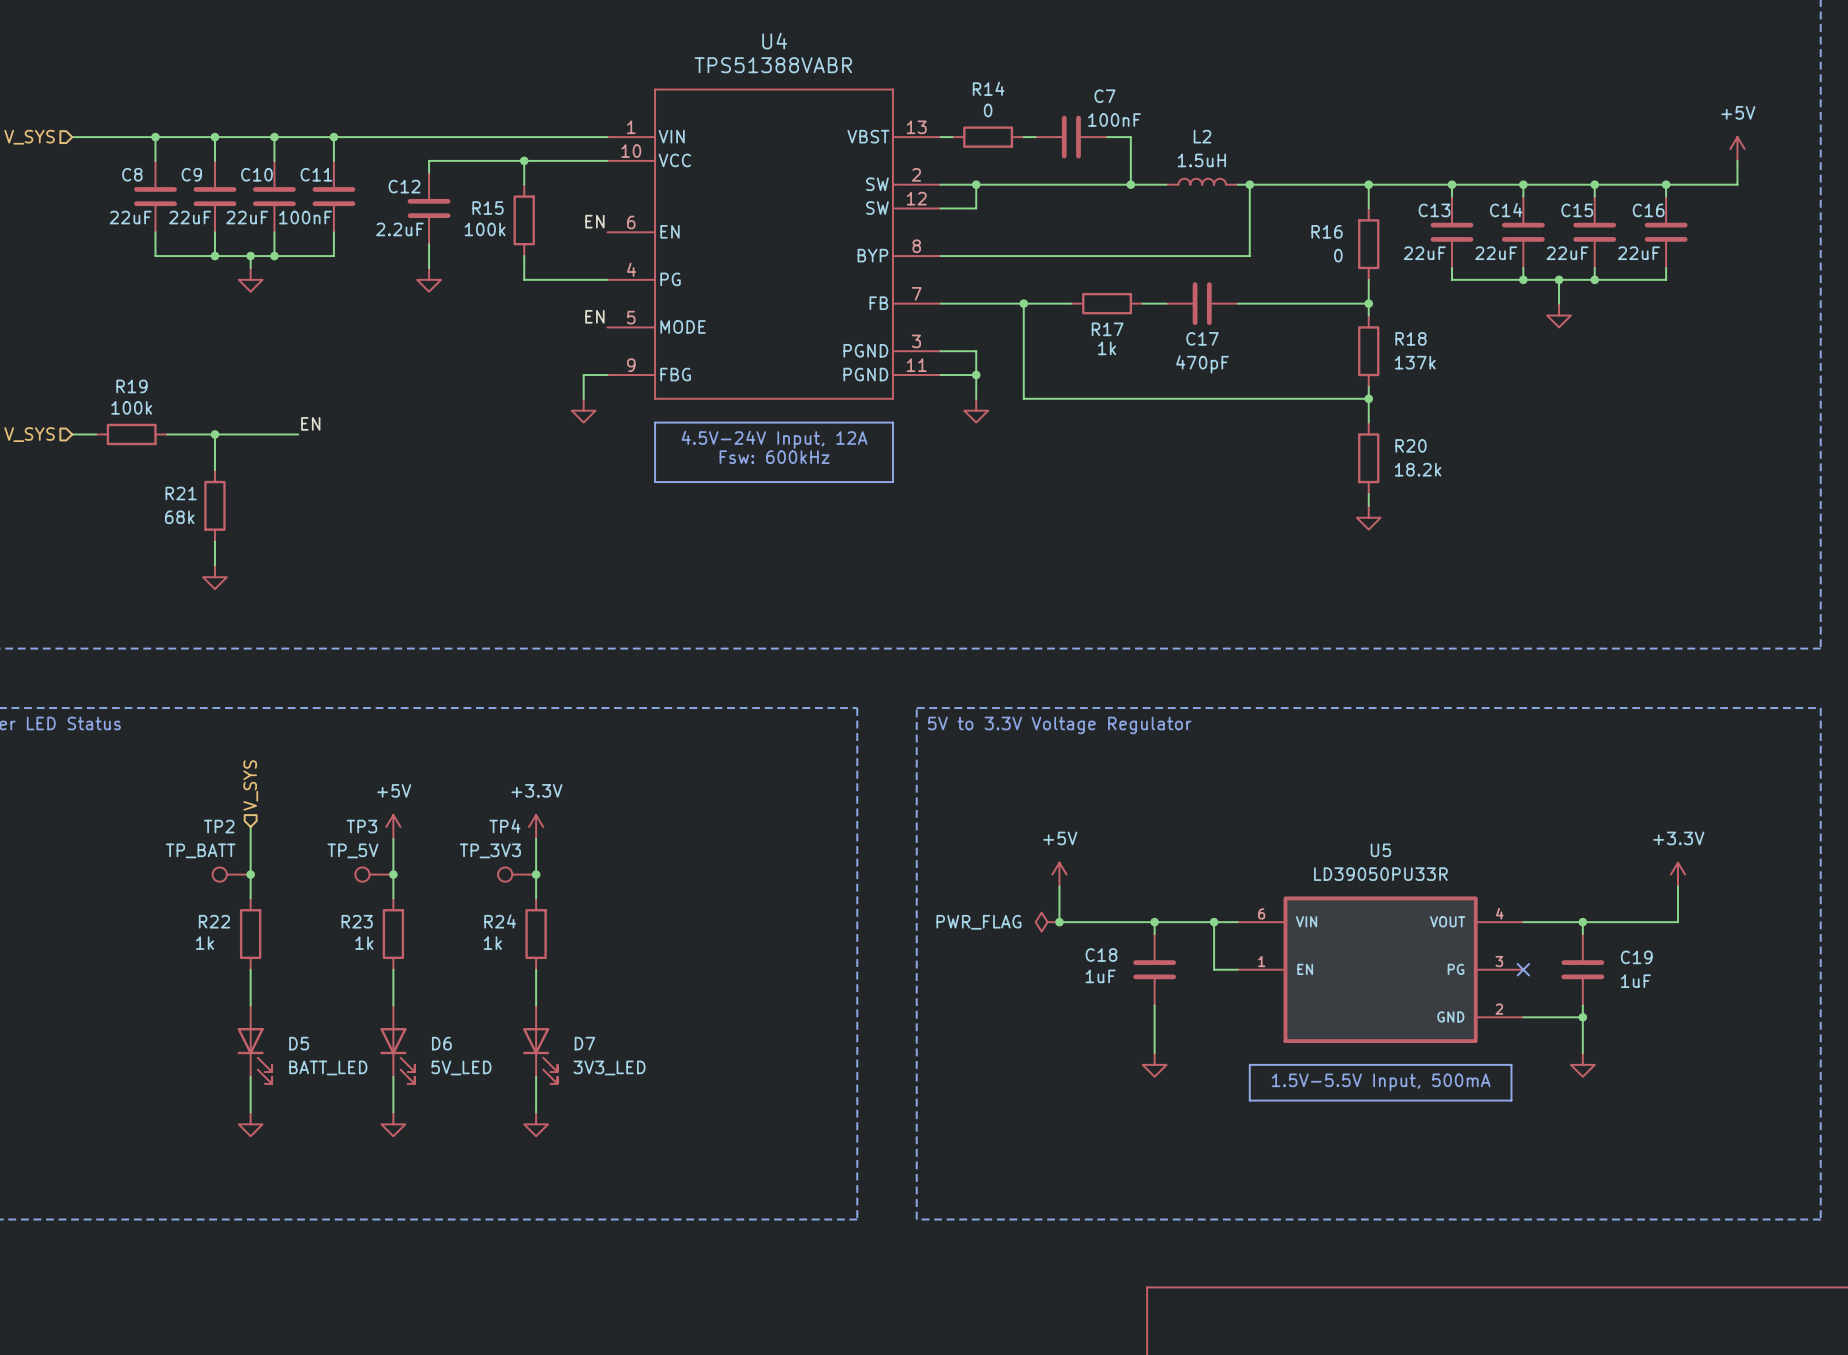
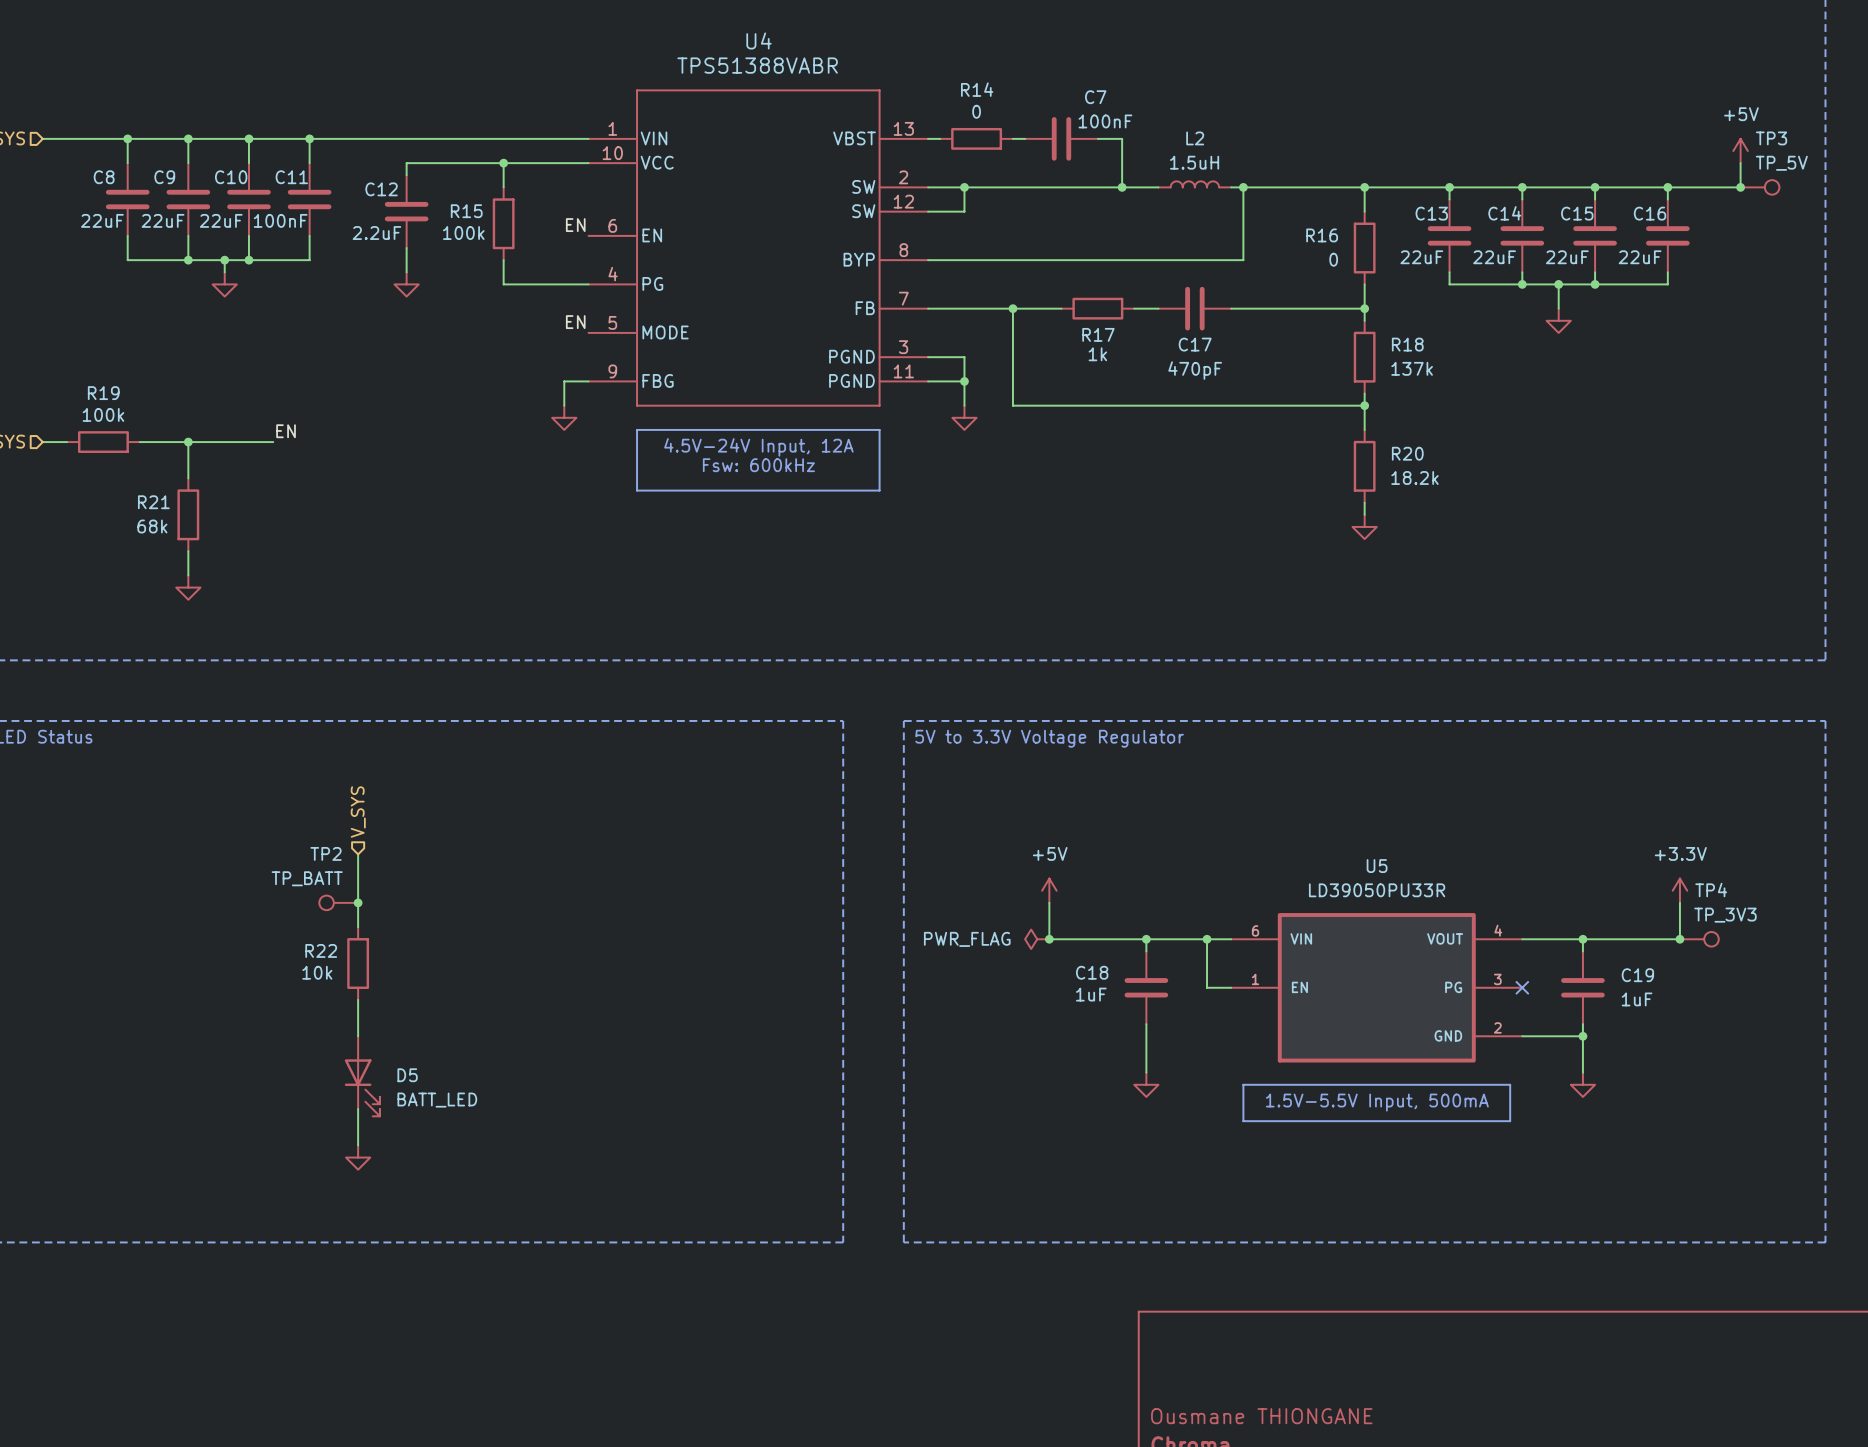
junction: none -> (1740, 187)
hierarchical label position: V_SYS (250, 785) -> V_SYS (358, 812)
wire: (250, 826) (250, 898) -> (358, 854) (358, 927)
TP3 name position: TP3 (361, 826) -> TP3 (1771, 138)
power symbol: +5V (393, 826) -> none
TP4 name position: TP4 (504, 826) -> TP4 (1711, 890)
power symbol: +3.3V (536, 826) -> none
wire: (393, 838) (393, 898) -> none
wire: (536, 838) (536, 898) -> none
TP3 value position: TP_5V (352, 850) -> TP_5V (1781, 163)
TP4 value position: TP_3V3 (490, 850) -> TP_3V3 (1725, 915)
TP2 position: (231, 874) -> (338, 902)
junction: (250, 874) -> none
TP3 rotation: 0° (362, 874) -> 180° (1772, 187)
TP3 position: (374, 874) -> (1760, 187)
junction position: (393, 874) -> (358, 902)
TP4 rotation: 0° (505, 874) -> 180° (1711, 939)
TP4 position: (517, 874) -> (1699, 939)
junction: (536, 874) -> none
junction: none -> (1679, 939)
R22 position: (250, 934) -> (358, 963)
R23: 1k (393, 934) -> none
R24: 1k (536, 934) -> none
R22 value: 1k (204, 943) -> 10k (317, 972)
wire: (250, 969) (250, 1005) -> (358, 999) (358, 1036)
wire: (393, 969) (393, 1005) -> none
wire: (536, 969) (536, 1005) -> none
D5 position: (254, 1044) -> (362, 1076)
D6: 5V_LED (397, 1044) -> none
D7: 3V3_LED (540, 1044) -> none
wire: (250, 1076) (250, 1112) -> (358, 1109) (358, 1145)
wire: (393, 1076) (393, 1112) -> none
wire: (536, 1076) (536, 1112) -> none
power symbol: (250, 1124) -> none
power symbol position: (393, 1124) -> (358, 1157)
power symbol: (536, 1124) -> none

